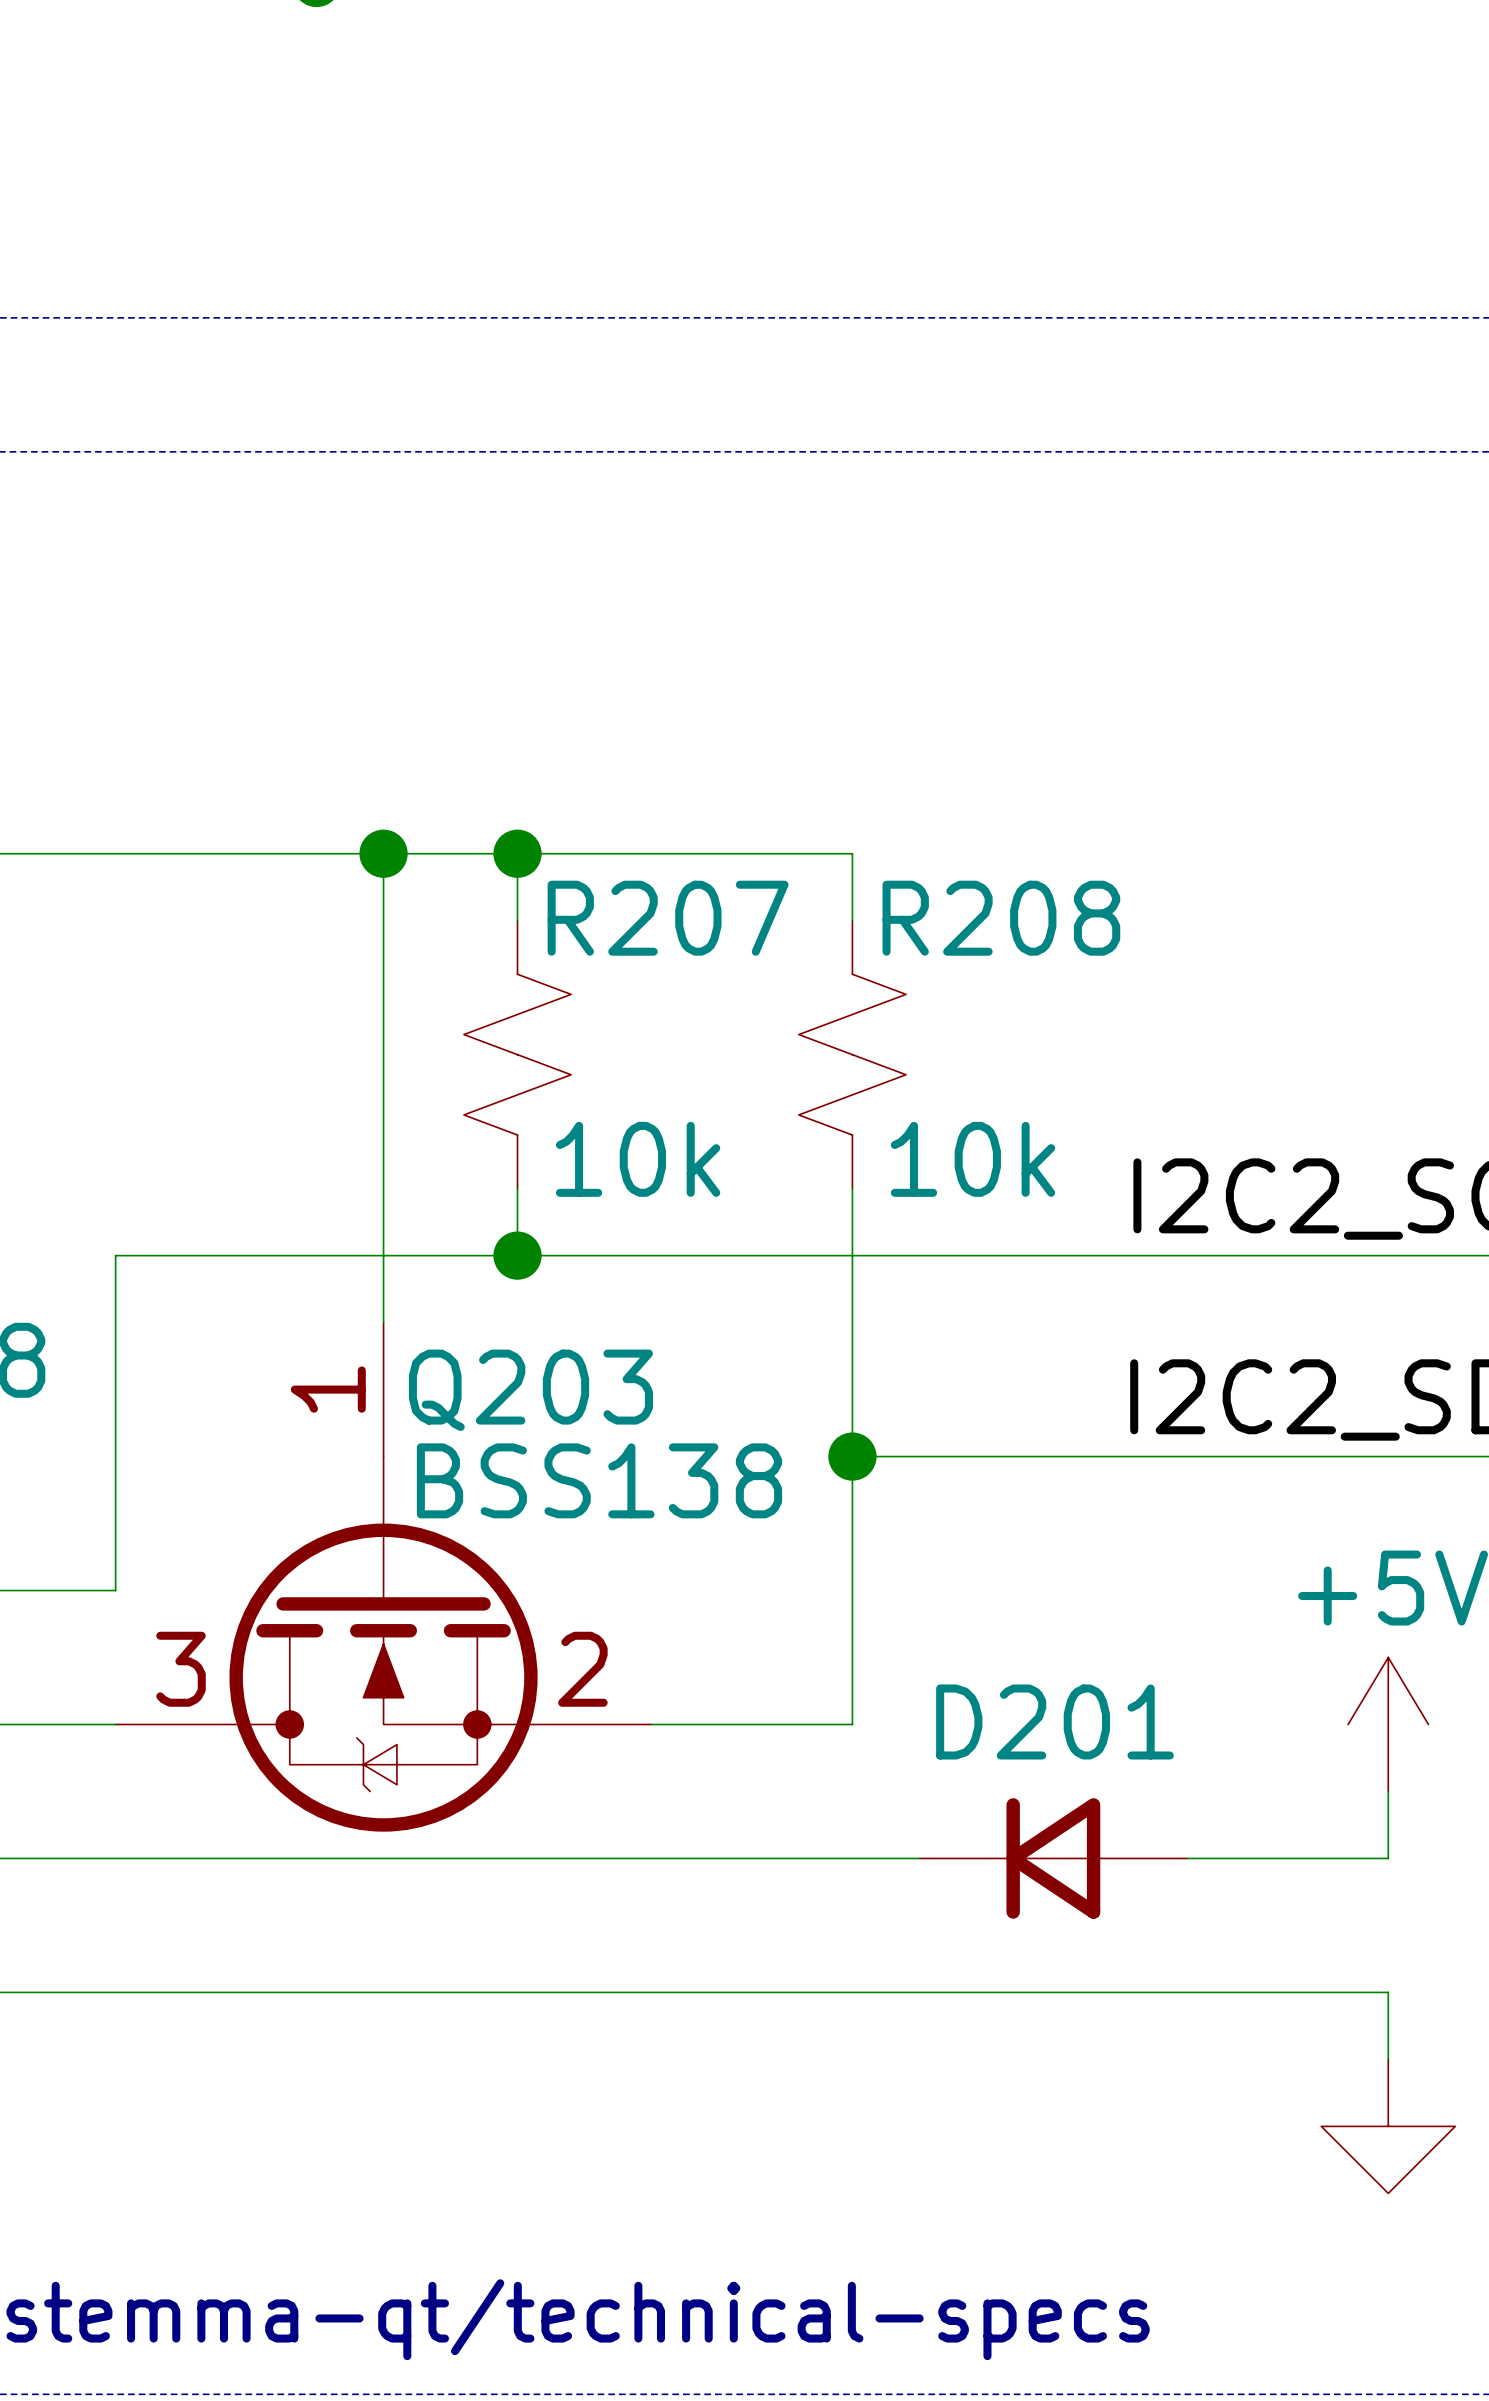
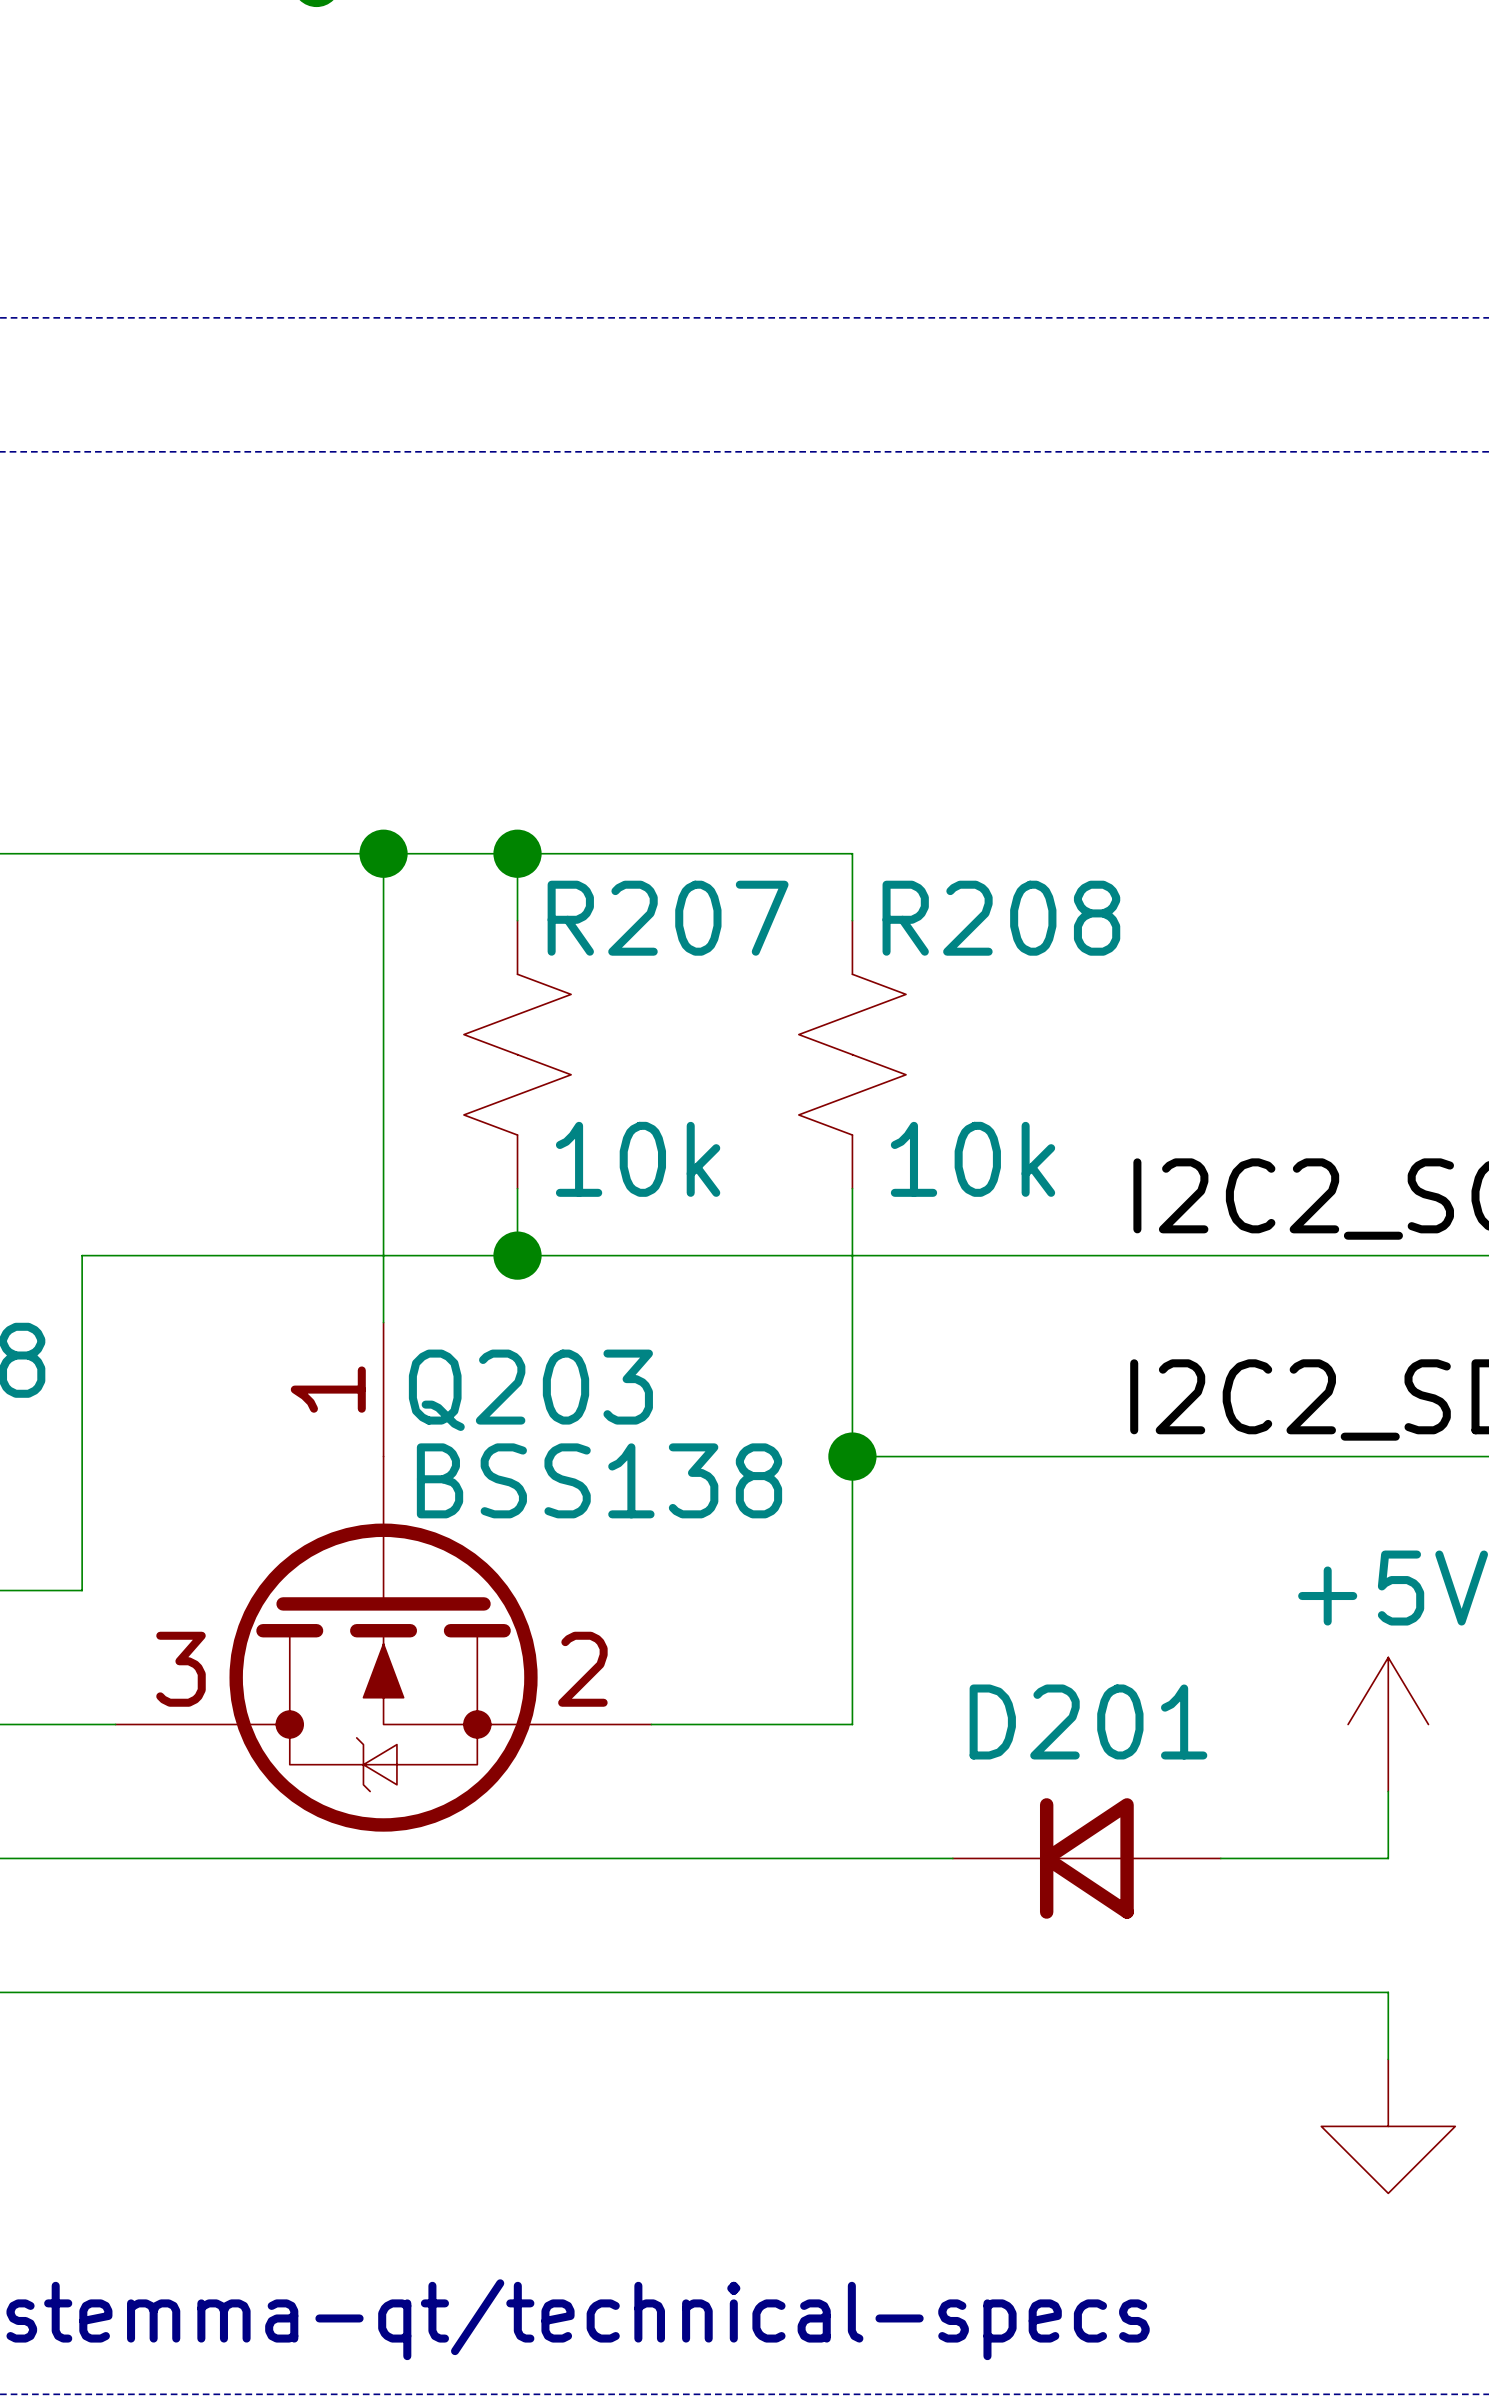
wire: (115, 1255) (115, 1590) (82, 1590) -> (115, 1255) (82, 1255) (82, 1590)
D201 position: (1053, 1858) -> (1086, 1858)

